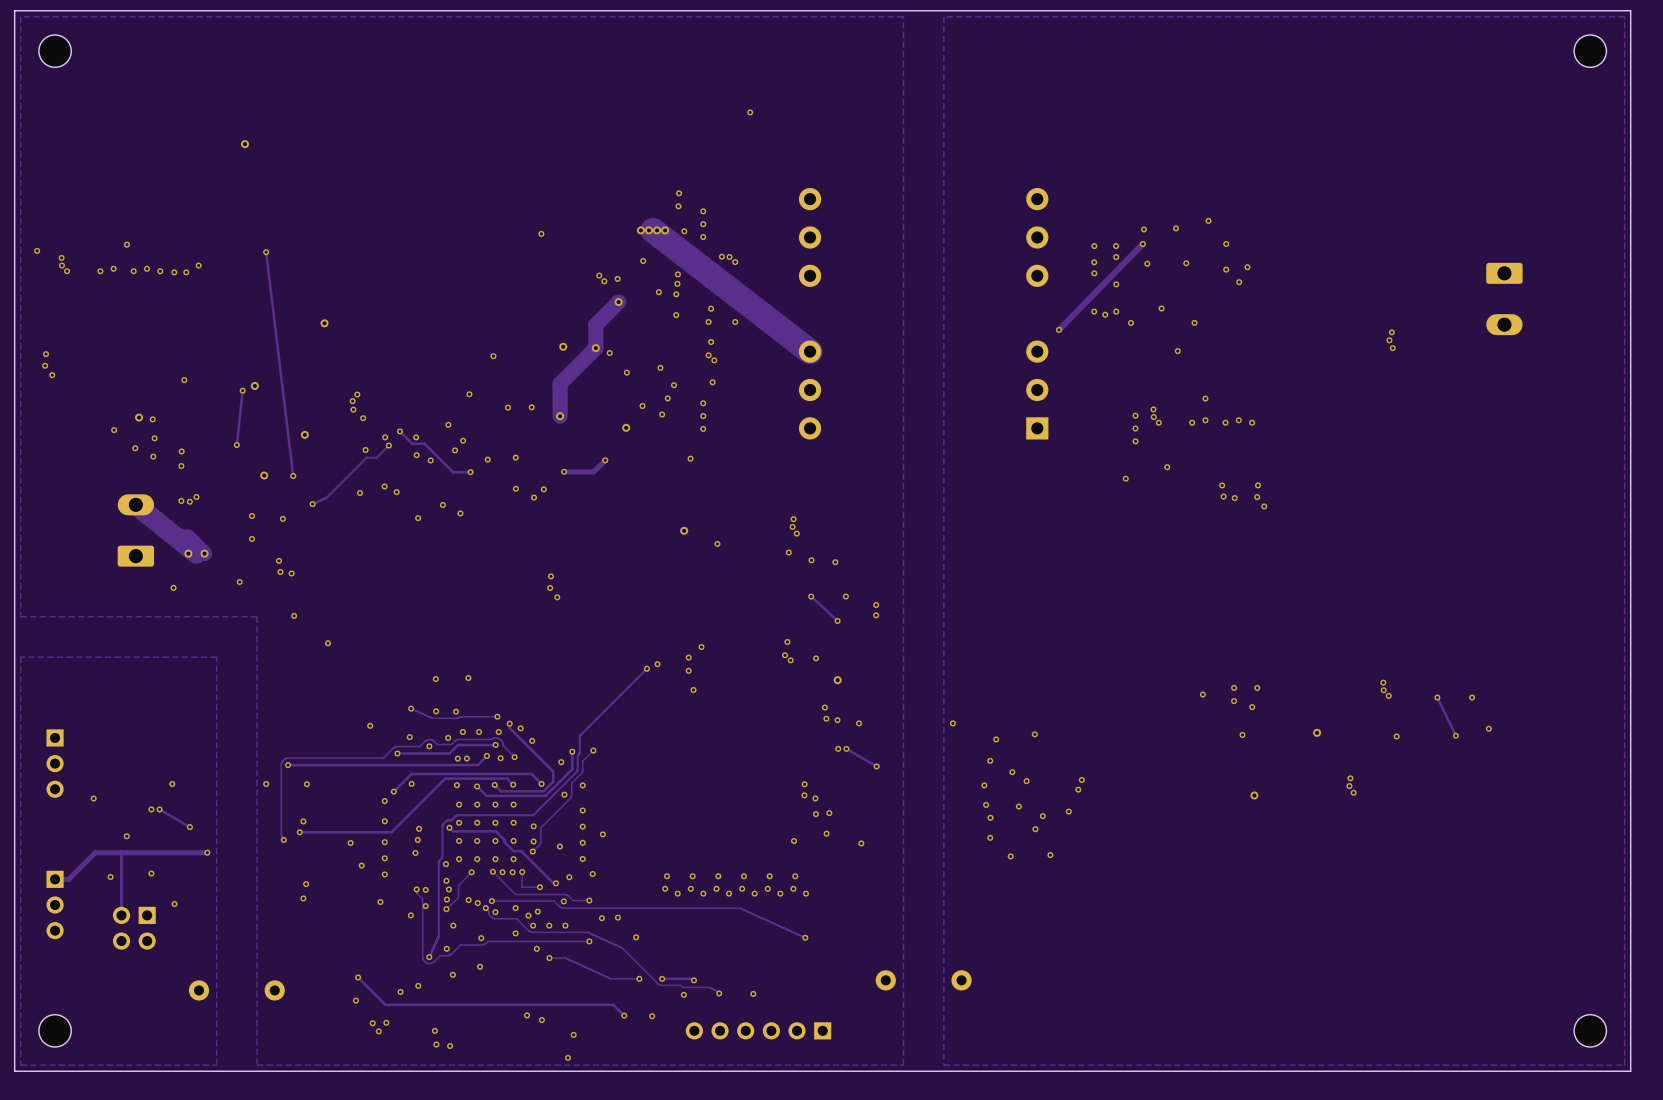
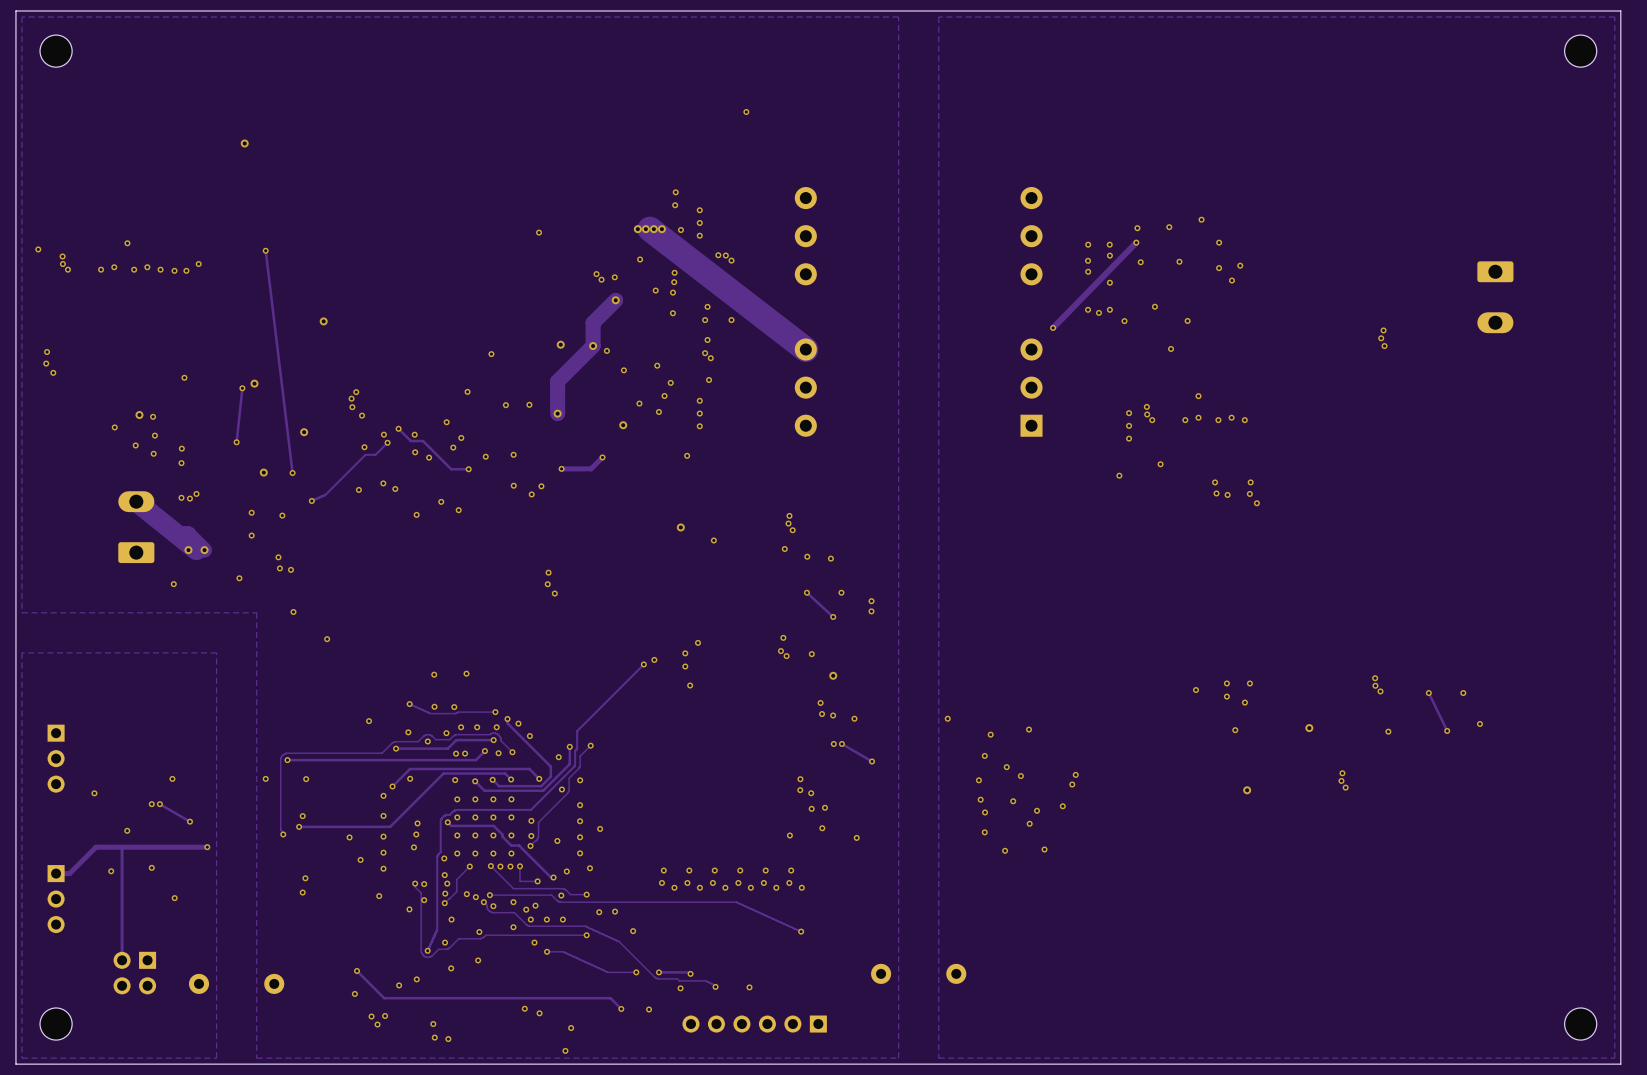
track: none -> (122, 909) (122, 960)
part position: (134, 928) -> (134, 973)

